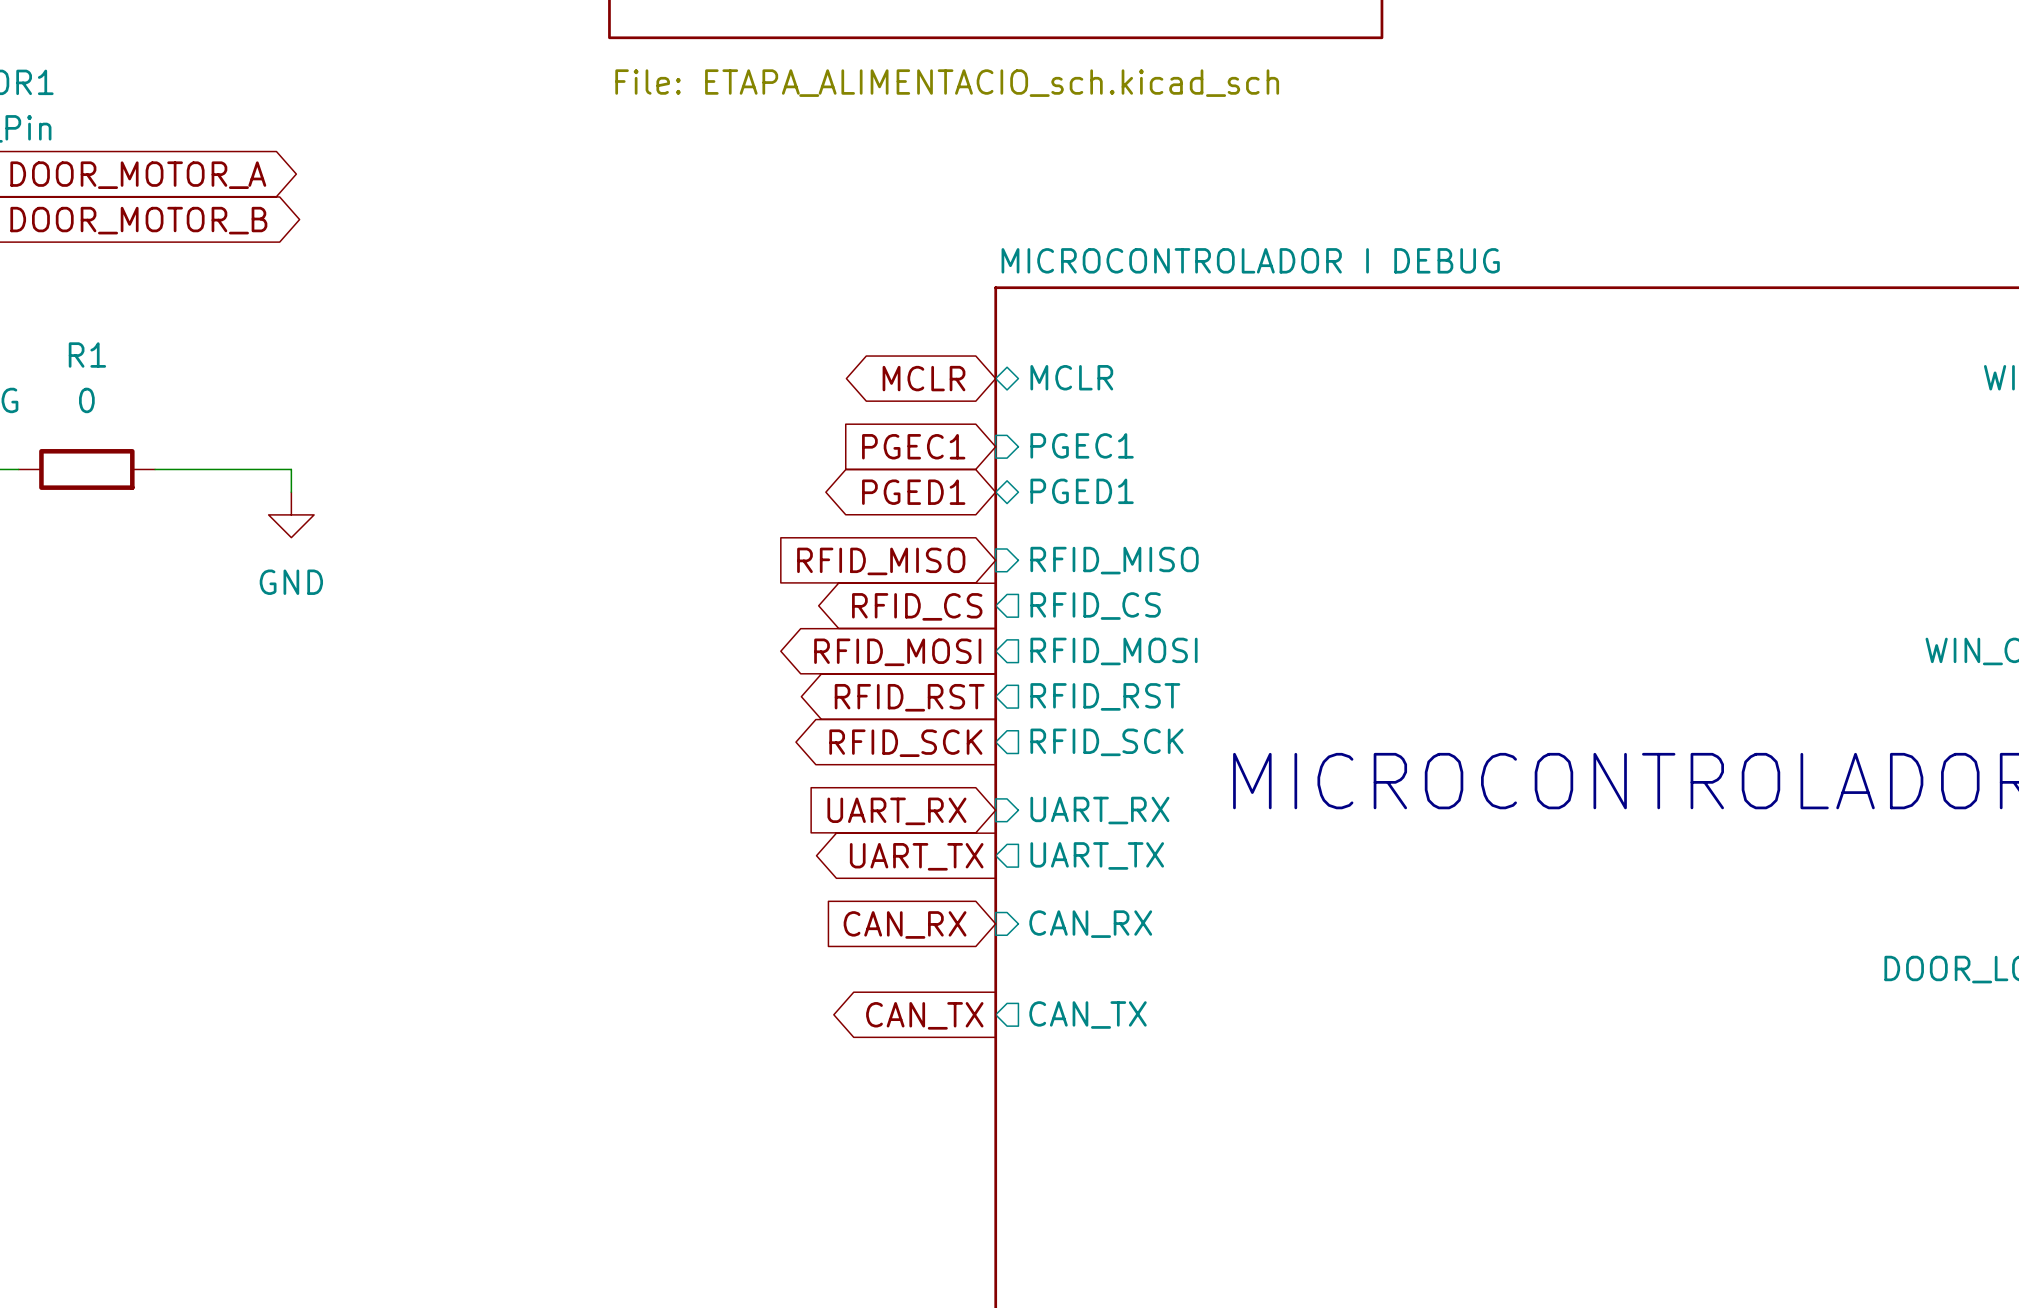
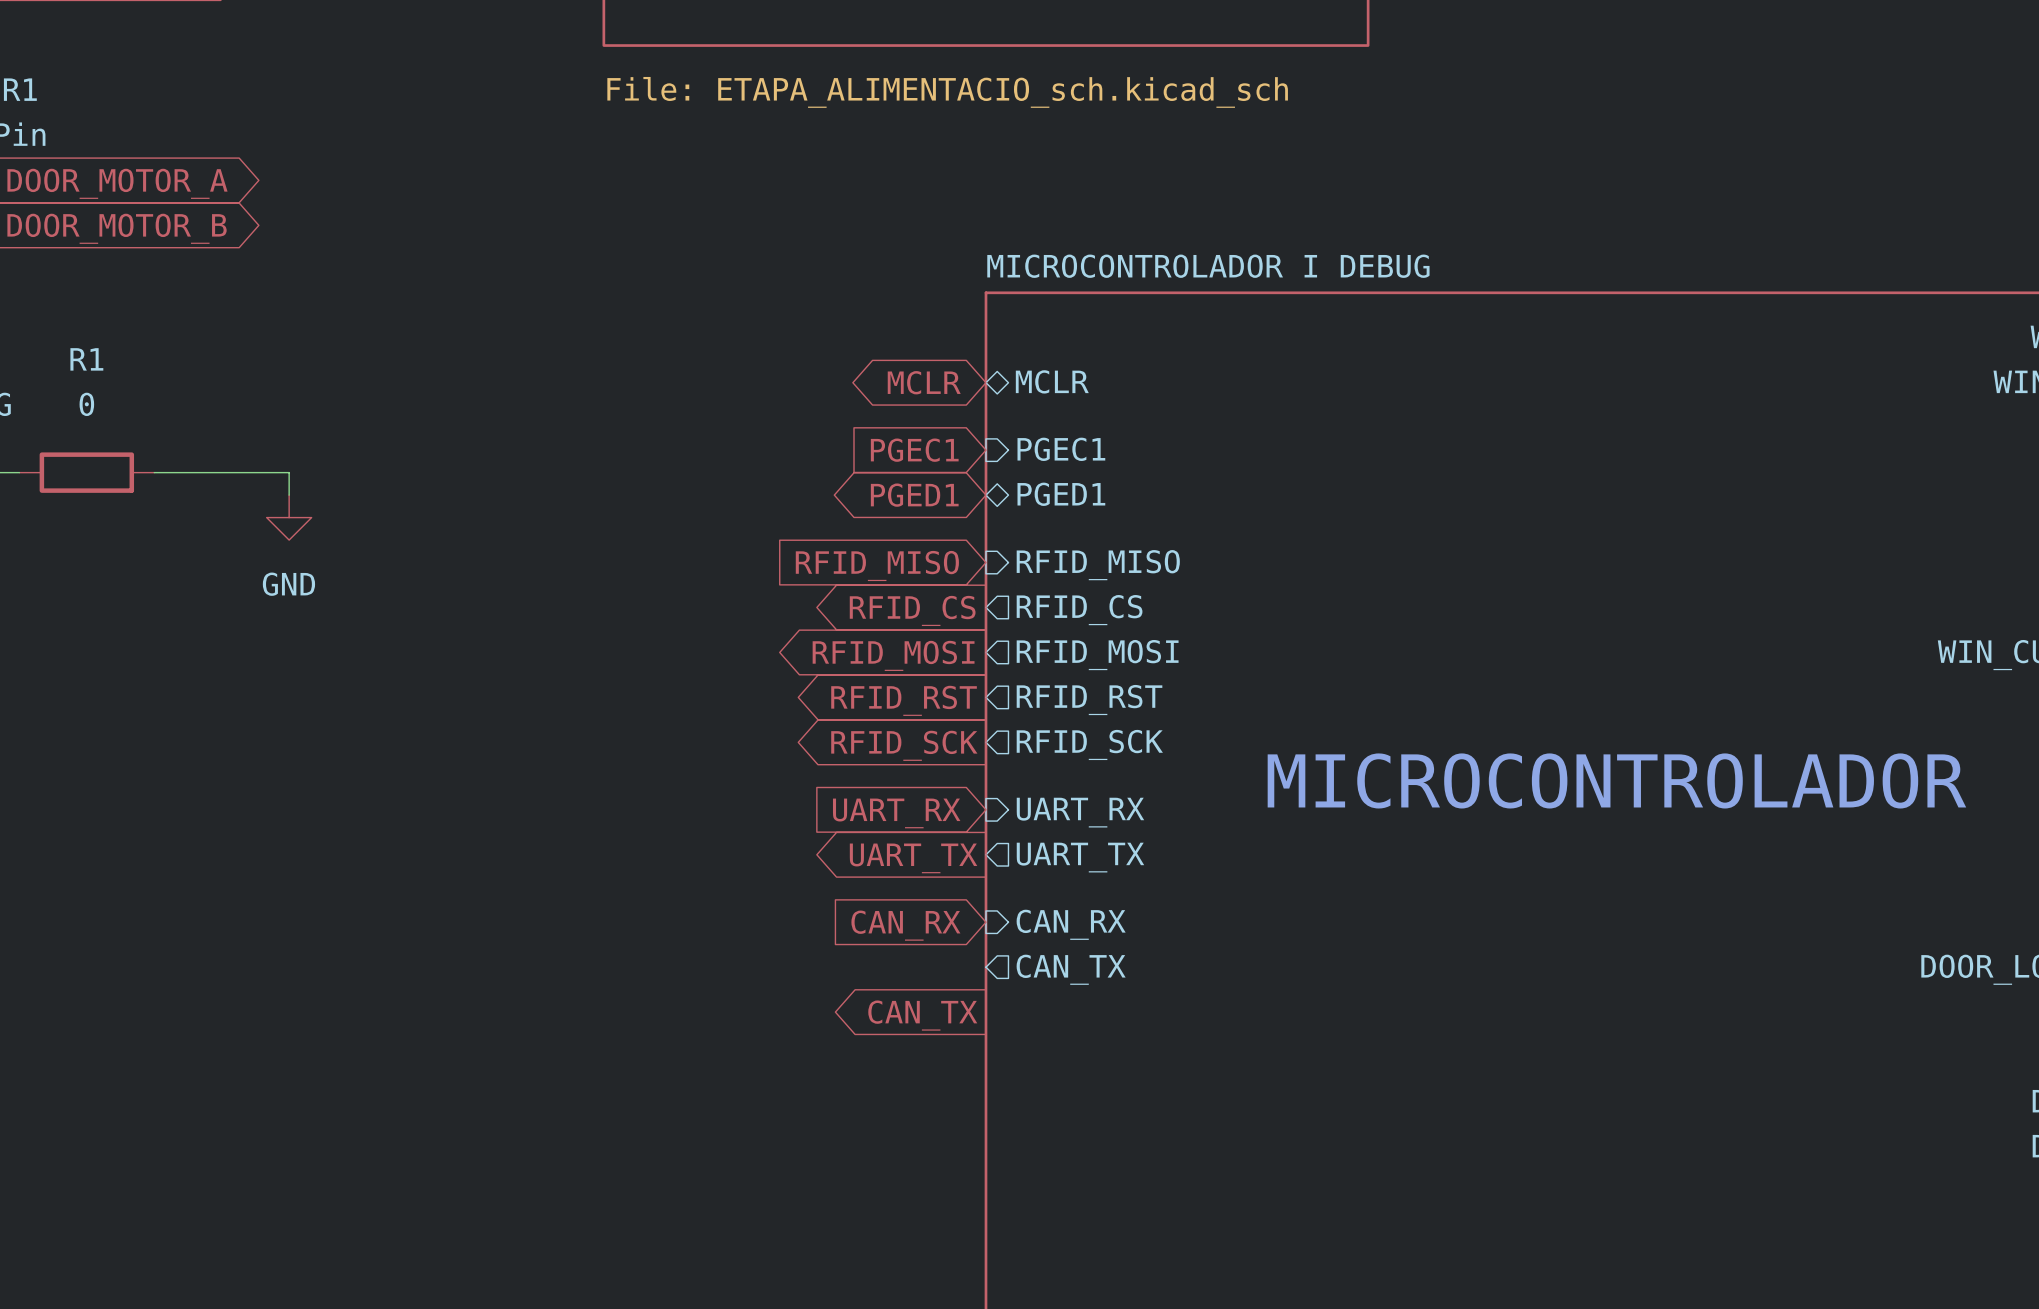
sheet pin position: CAN_TX (1088, 1015) -> CAN_TX (1071, 969)

